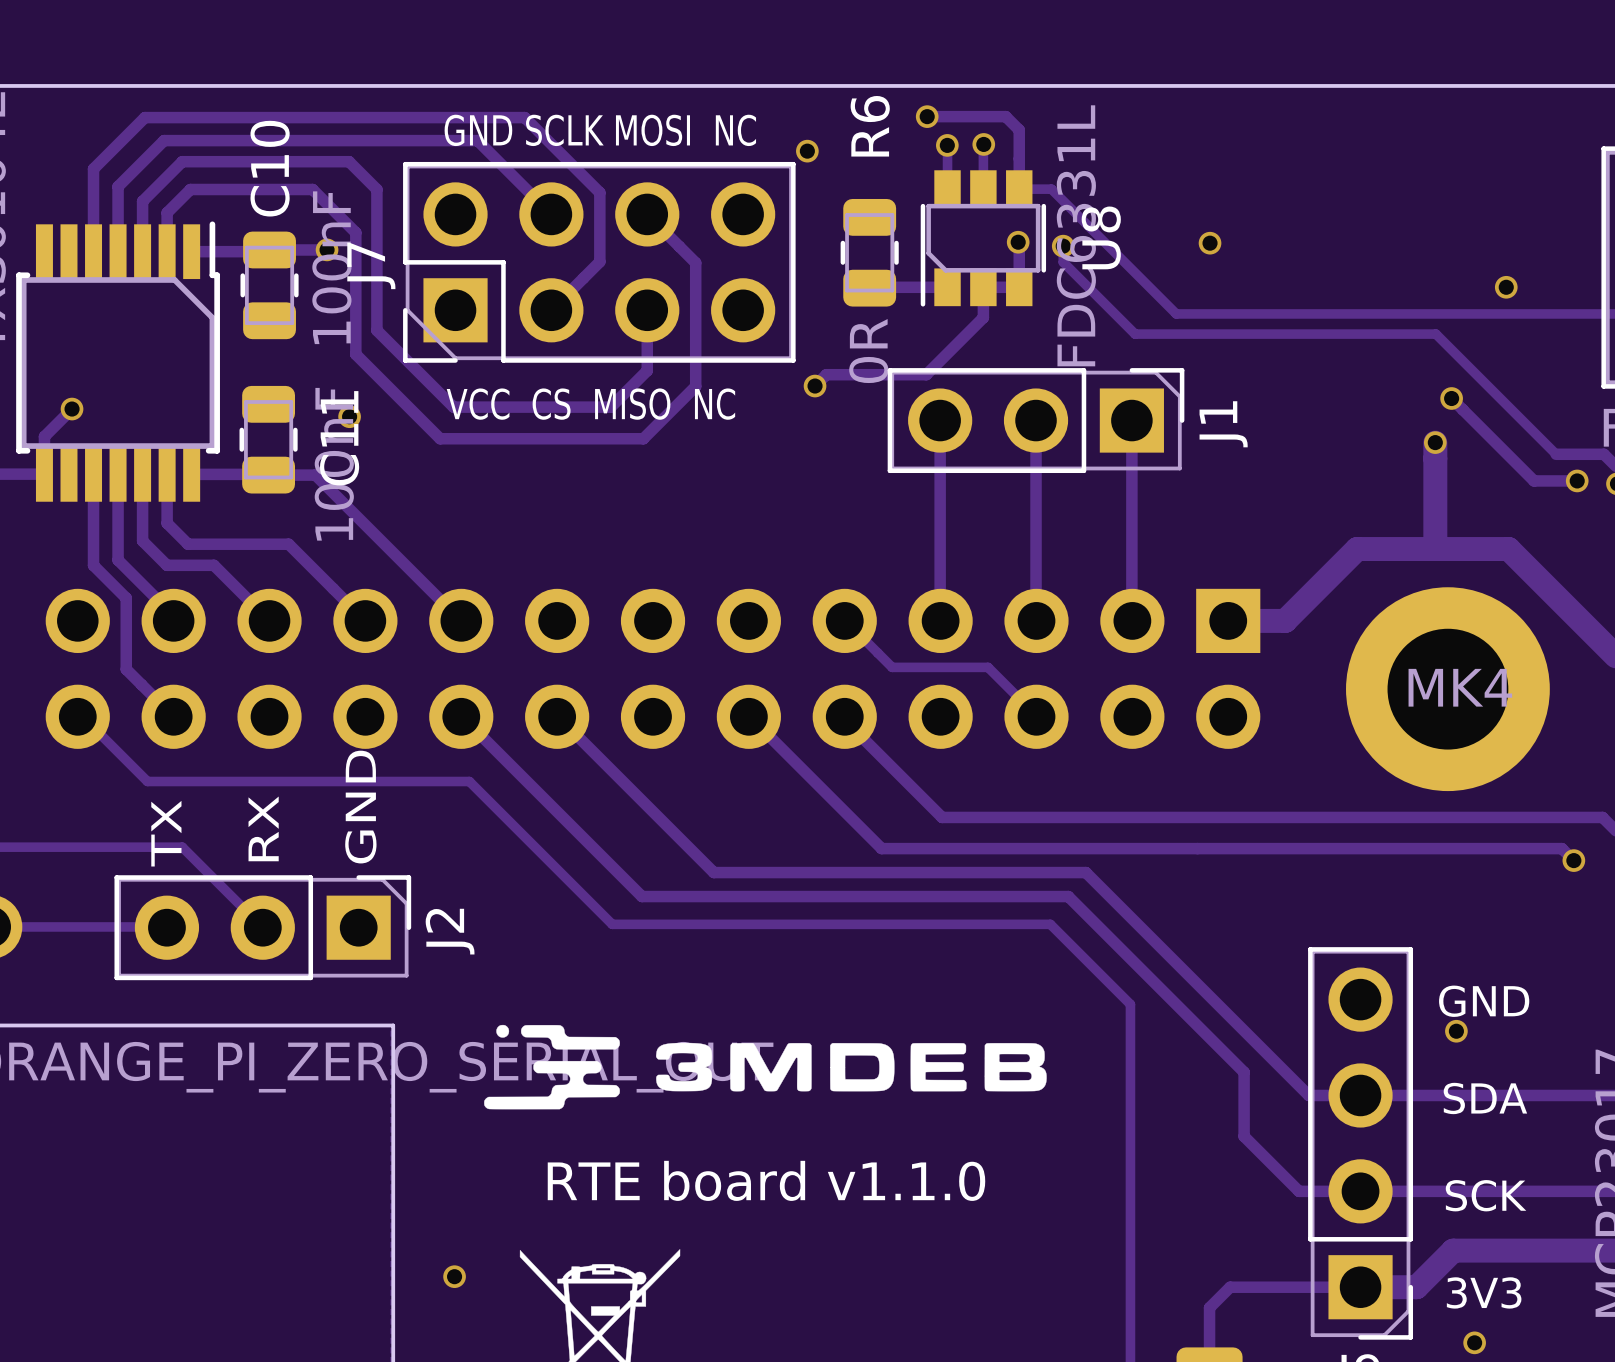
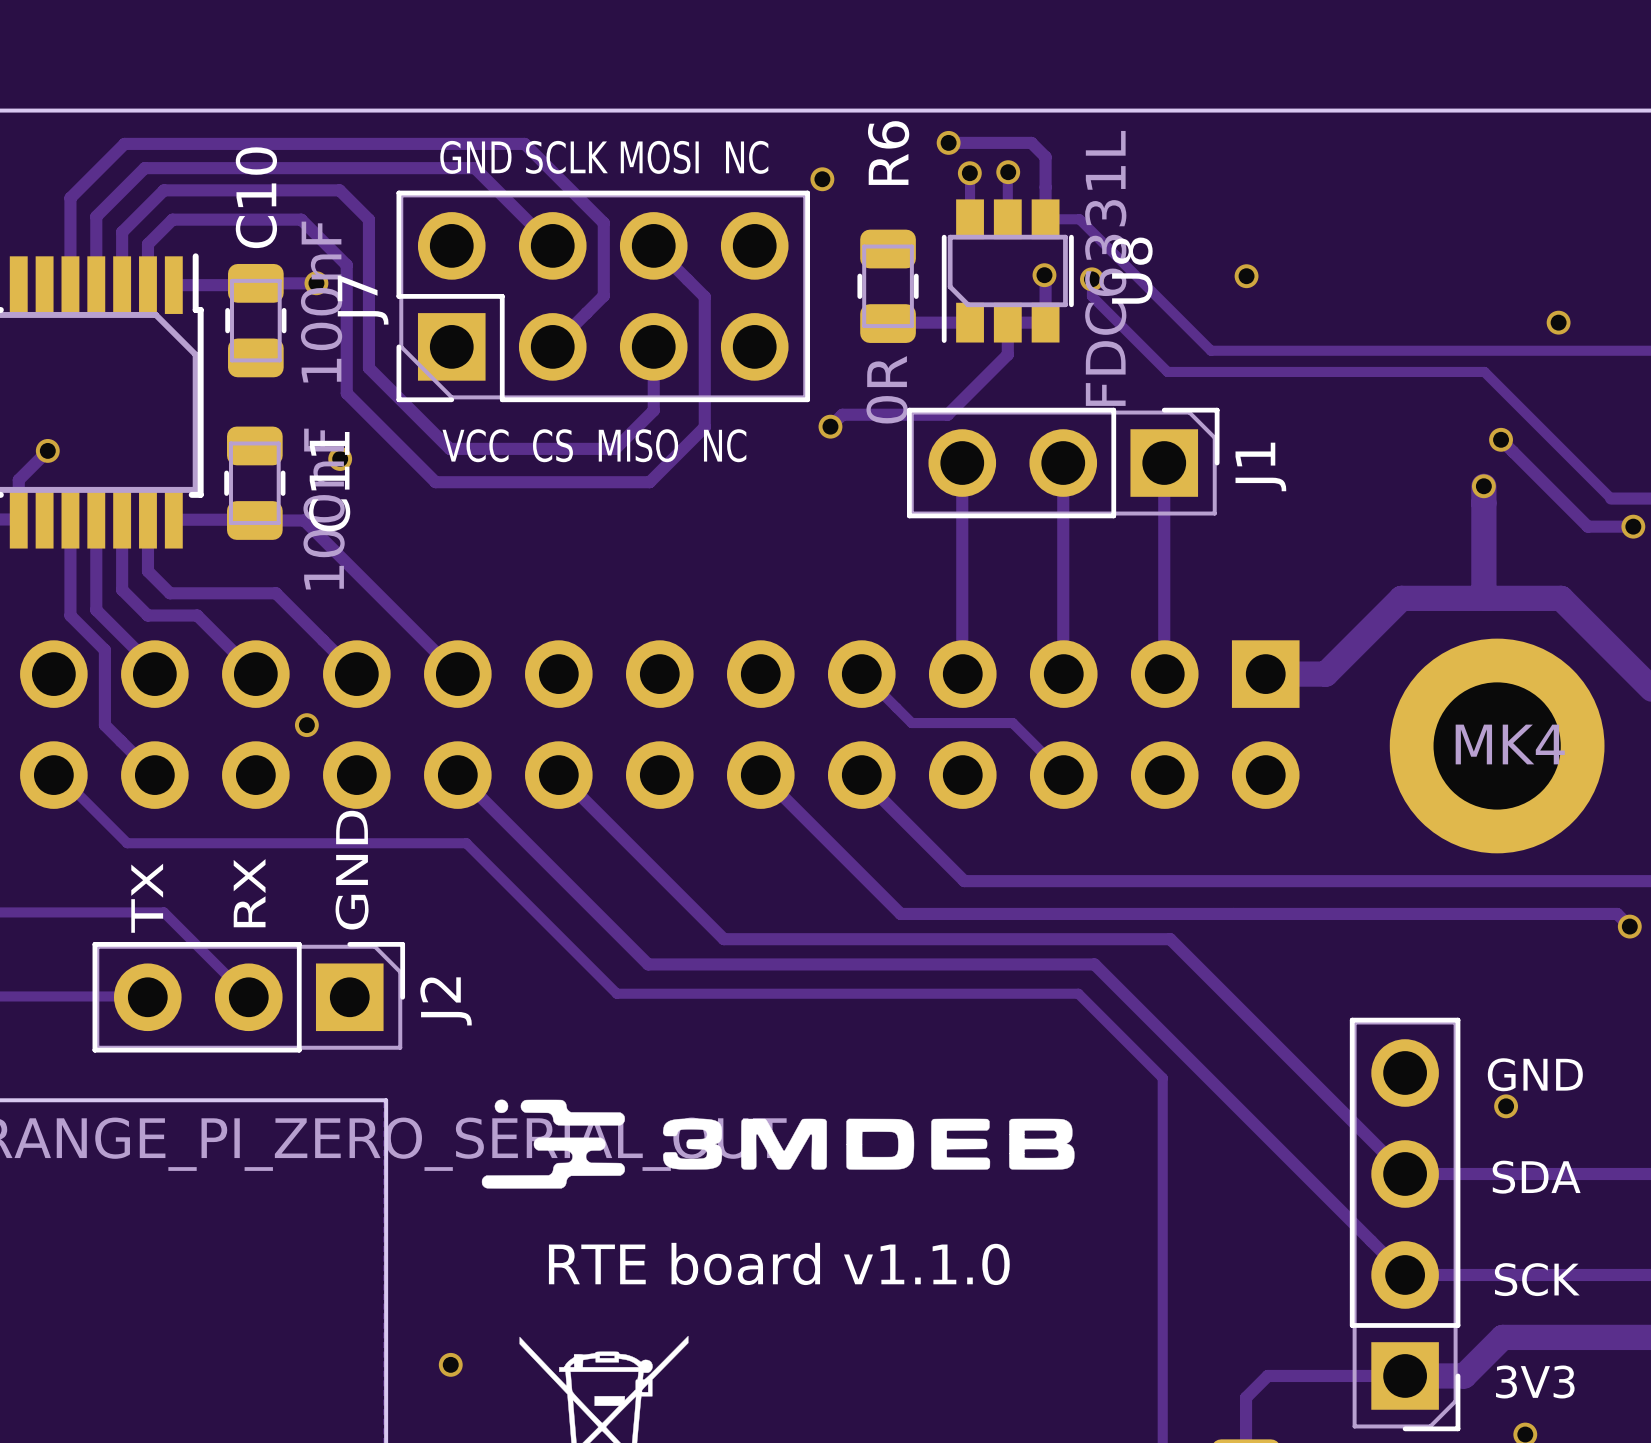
via: none -> (306, 725)
track: (1085, 872) (1308, 1095) (1360, 1095) -> (1115, 939) (1170, 939) (1405, 1173)
track: (1065, 896) (1068, 896) (1244, 1072) (1244, 1136) (1299, 1191) (1360, 1191) -> (1094, 964) (1405, 1274)

